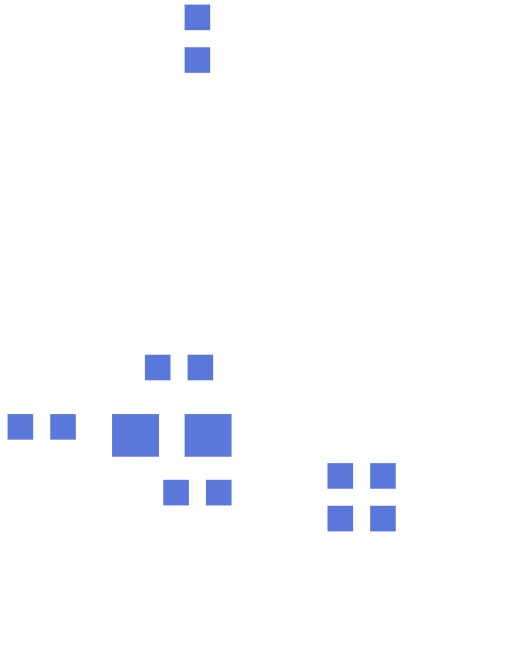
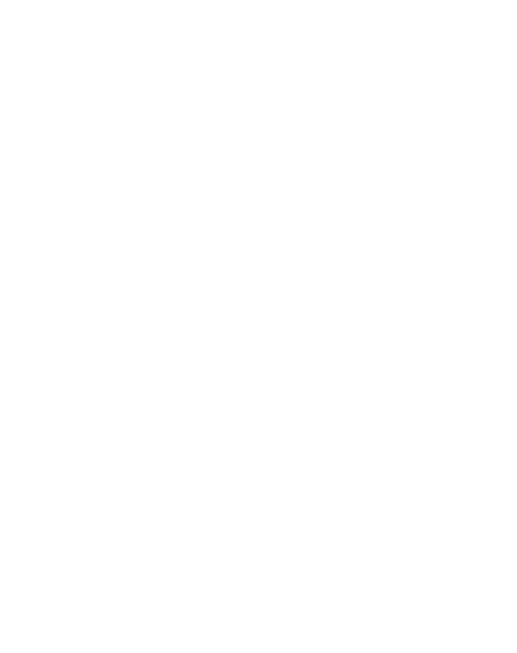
part: (197, 38) -> none
part: (179, 367) -> none
part: (41, 426) -> none
part: (171, 435) -> none
part: (197, 492) -> none
part: (340, 497) -> none
part: (382, 497) -> none

